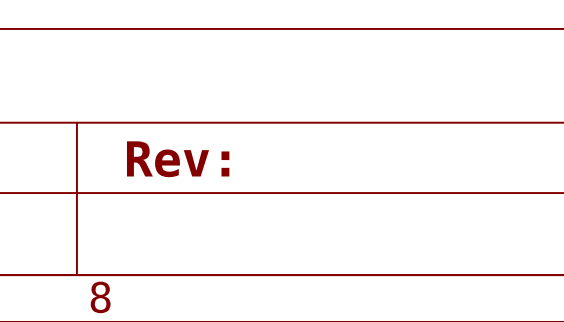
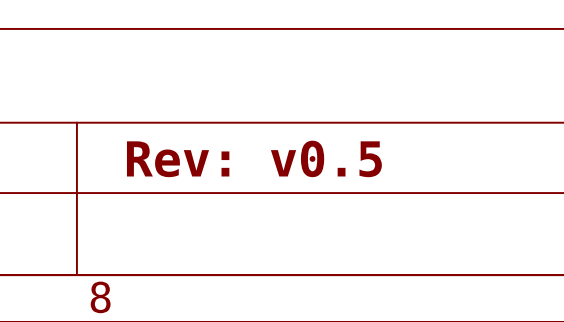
title block: Rev: (178, 159) -> Rev: v0.5 (254, 158)

